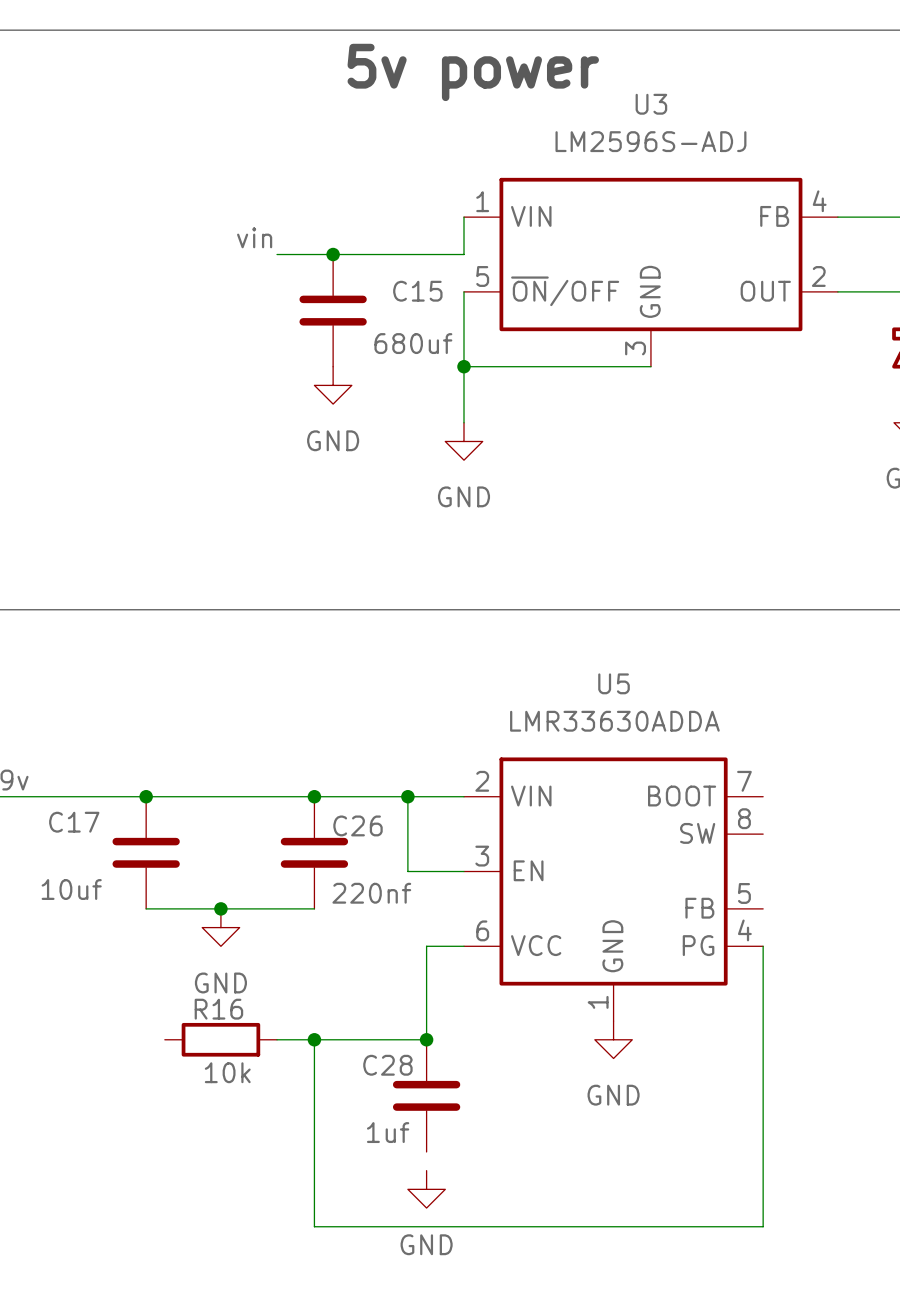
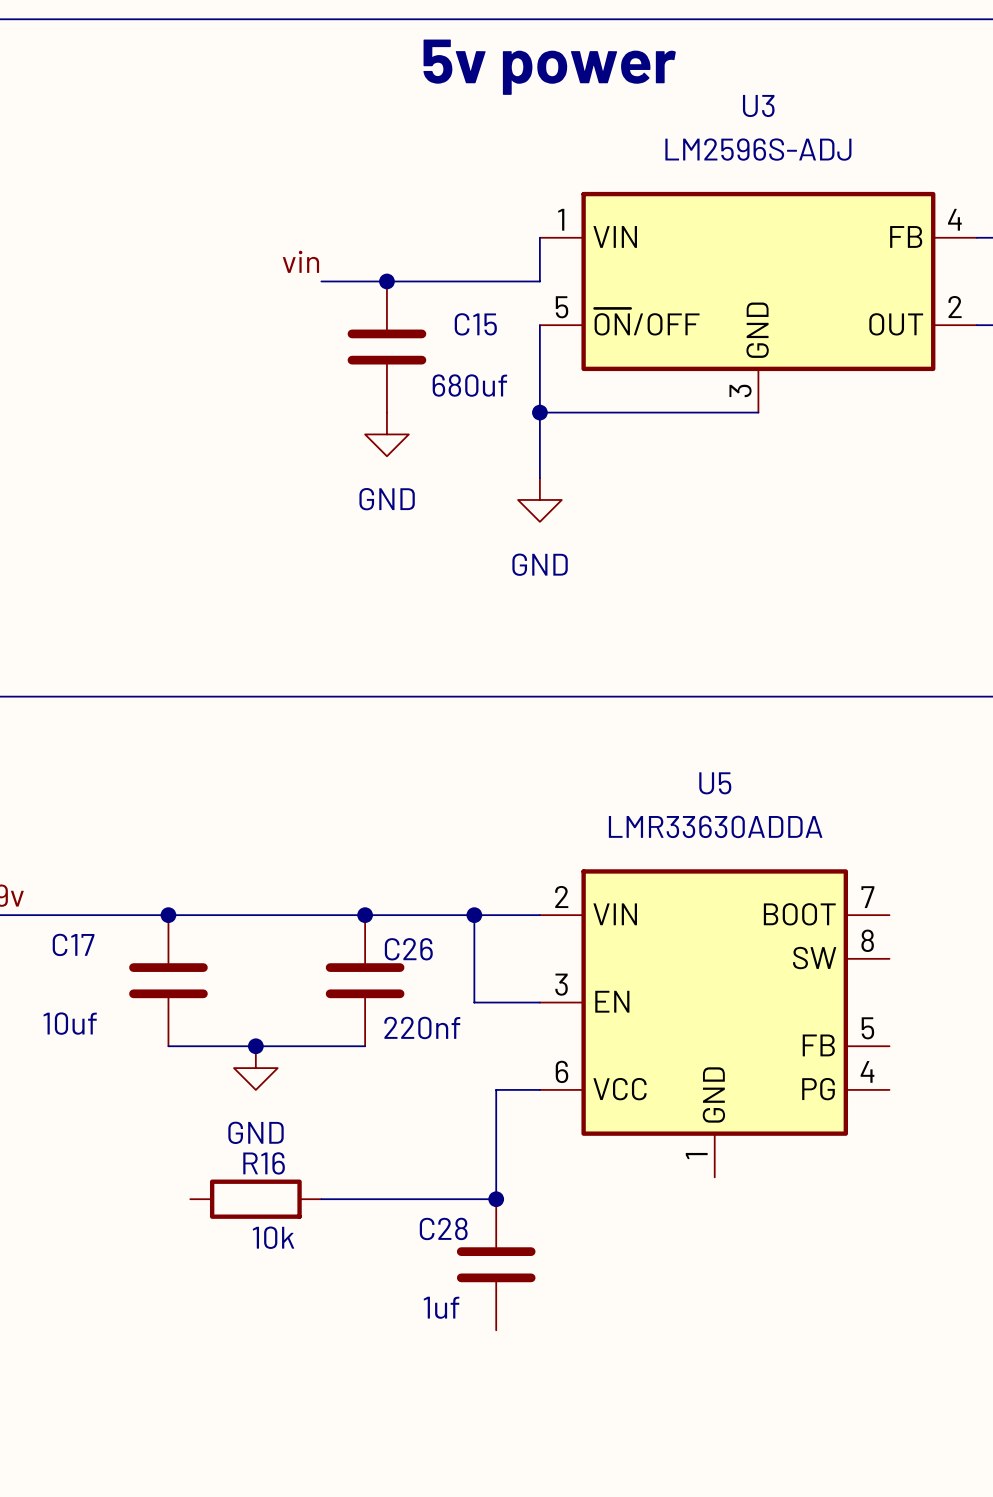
wire: (763, 946) (763, 1226) (314, 1226) (314, 1039) -> none
junction: (314, 1039) -> none
power symbol: GND (613, 1039) -> none
power symbol: GND (426, 1189) -> none

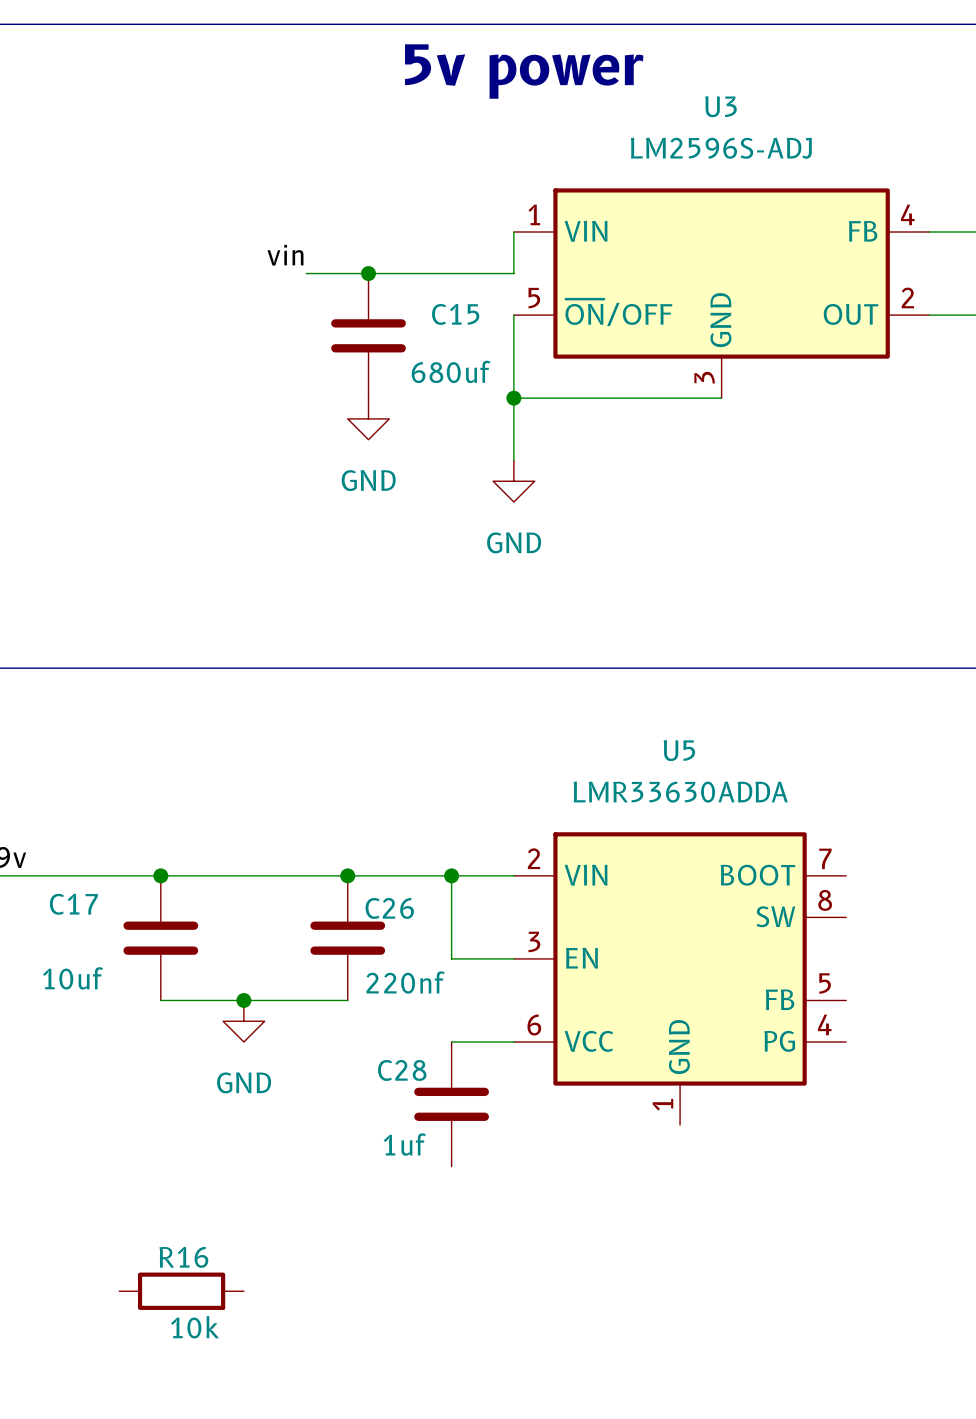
wire: (496, 1089) (496, 1199) (321, 1199) -> (472, 1042) (451, 1042)
R16 position: (255, 1199) -> (181, 1291)
junction: (496, 1199) -> none
C28 position: (496, 1264) -> (451, 1104)

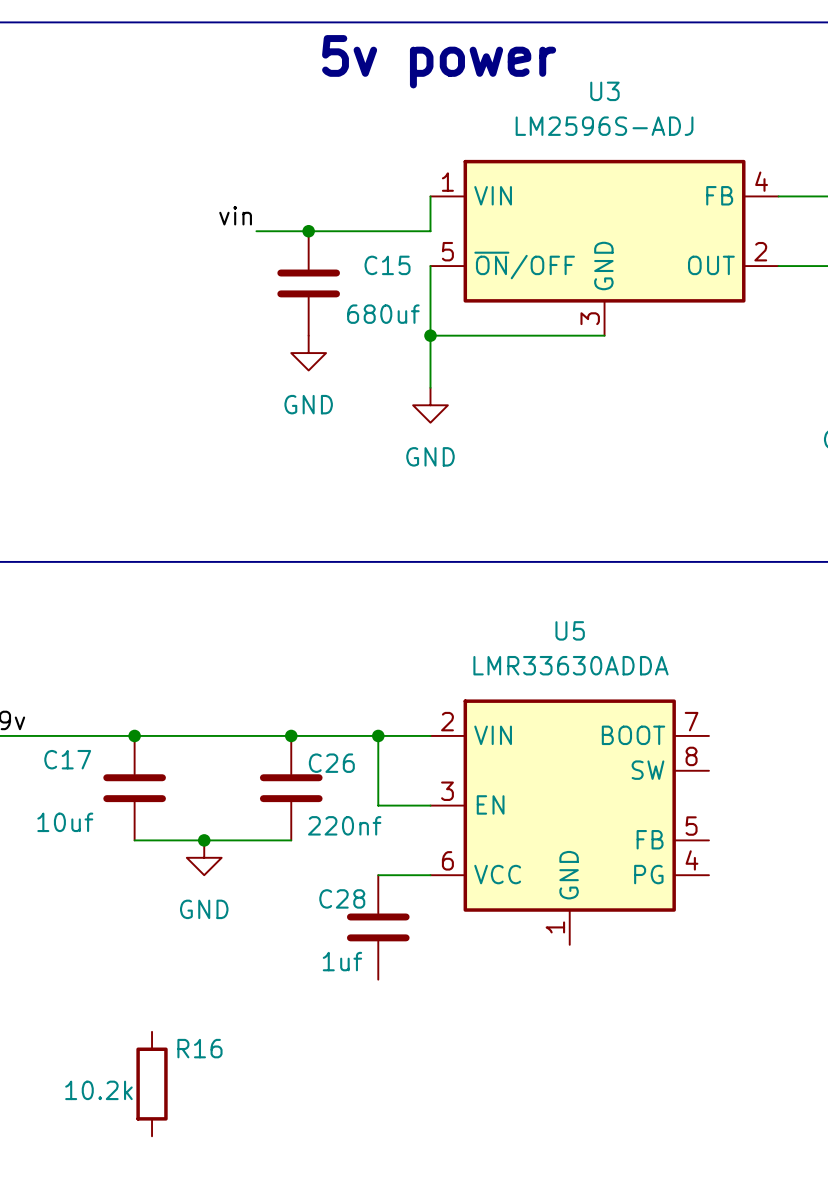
R16 name position: R16 (183, 1257) -> R16 (199, 1048)
R16 rotation: 0° (181, 1291) -> 90° clockwise (152, 1084)
R16 value: 10k (195, 1327) -> 10.2k (98, 1090)

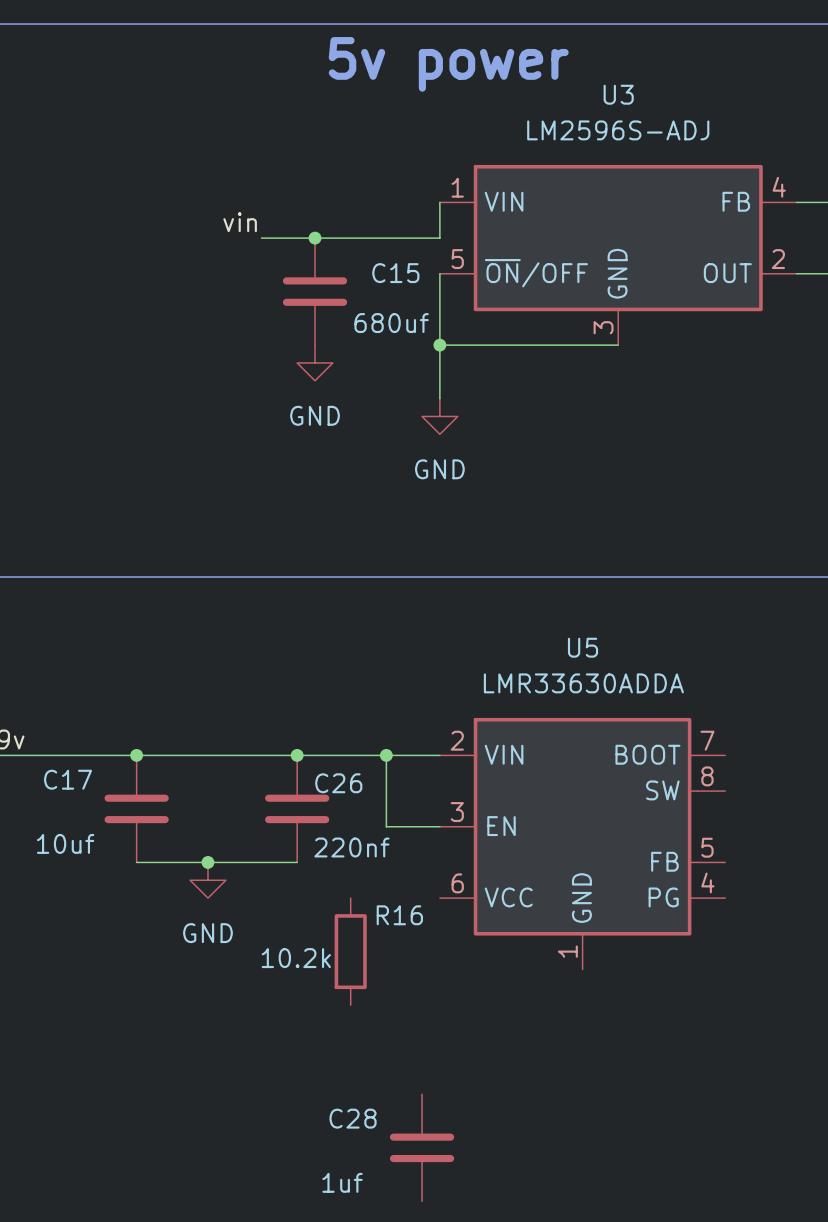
wire: (378, 875) (430, 875) -> none
C28 name position: C28 (342, 898) -> C28 (353, 1118)
C28 position: (378, 927) -> (422, 1147)
C28 value position: 1uf (342, 961) -> 1uf (342, 1182)
R16 position: (152, 1084) -> (350, 951)

